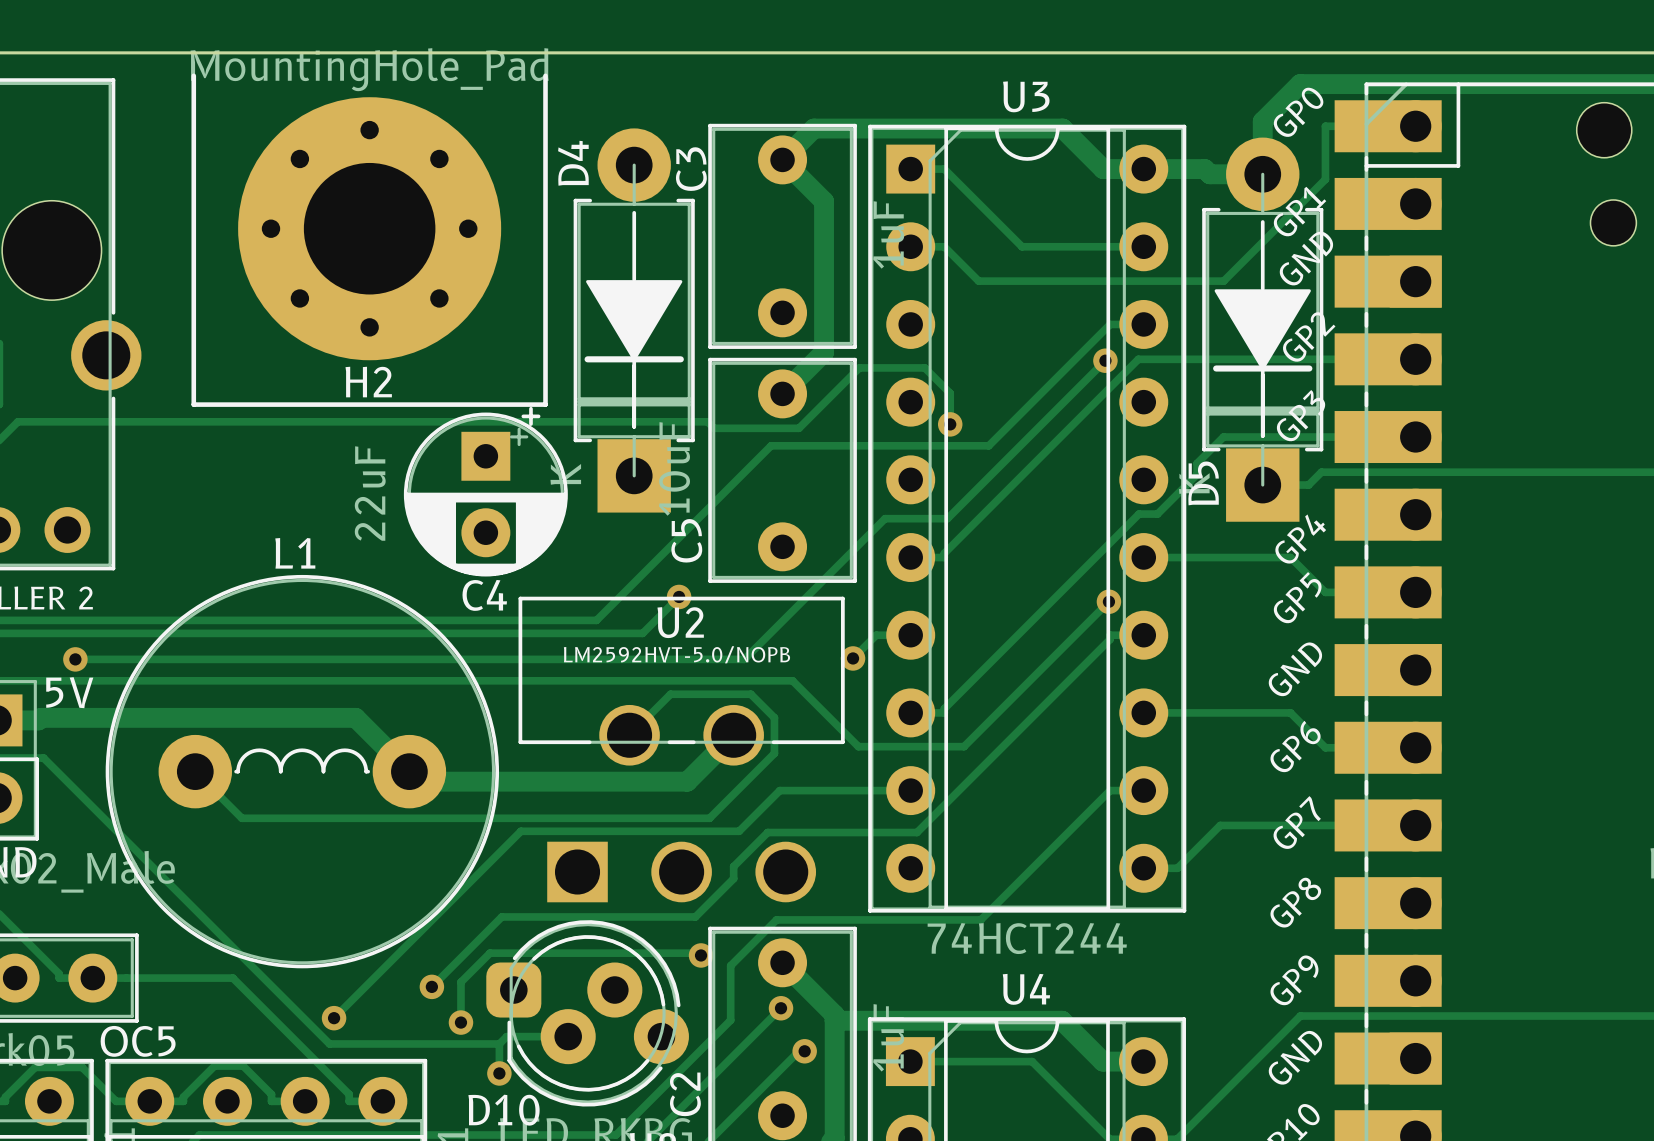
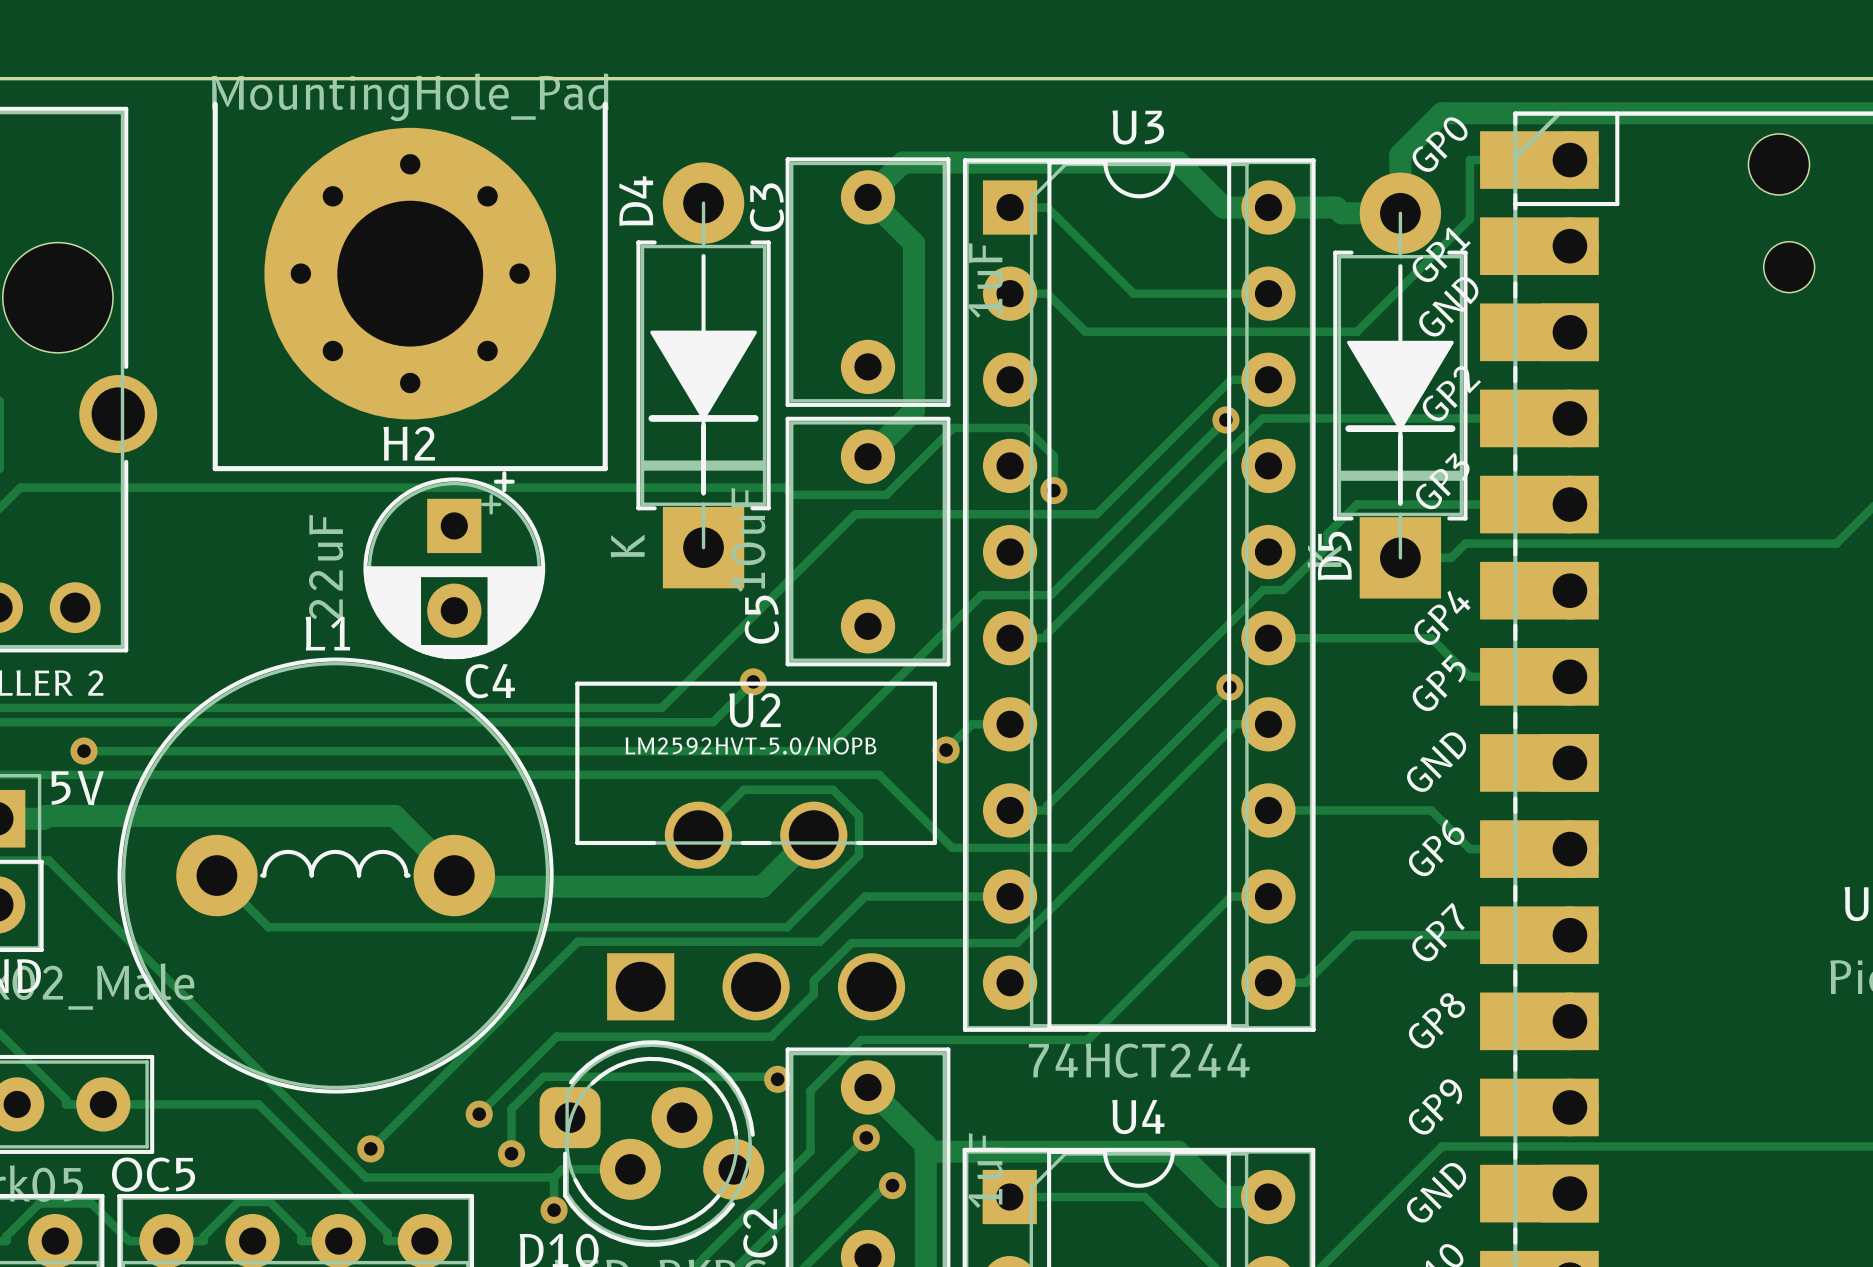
C4 position: (485, 491) -> (454, 565)
C4 name position: C4 (484, 595) -> C4 (490, 681)

